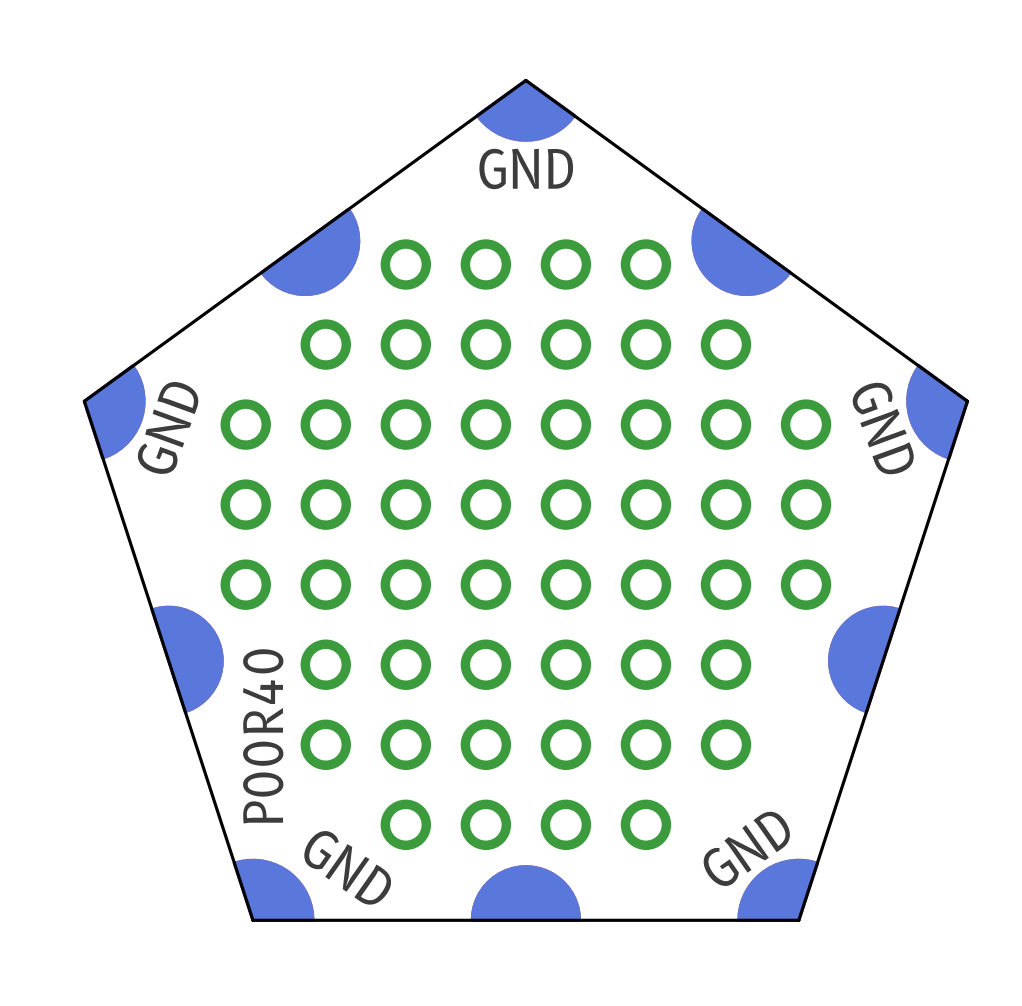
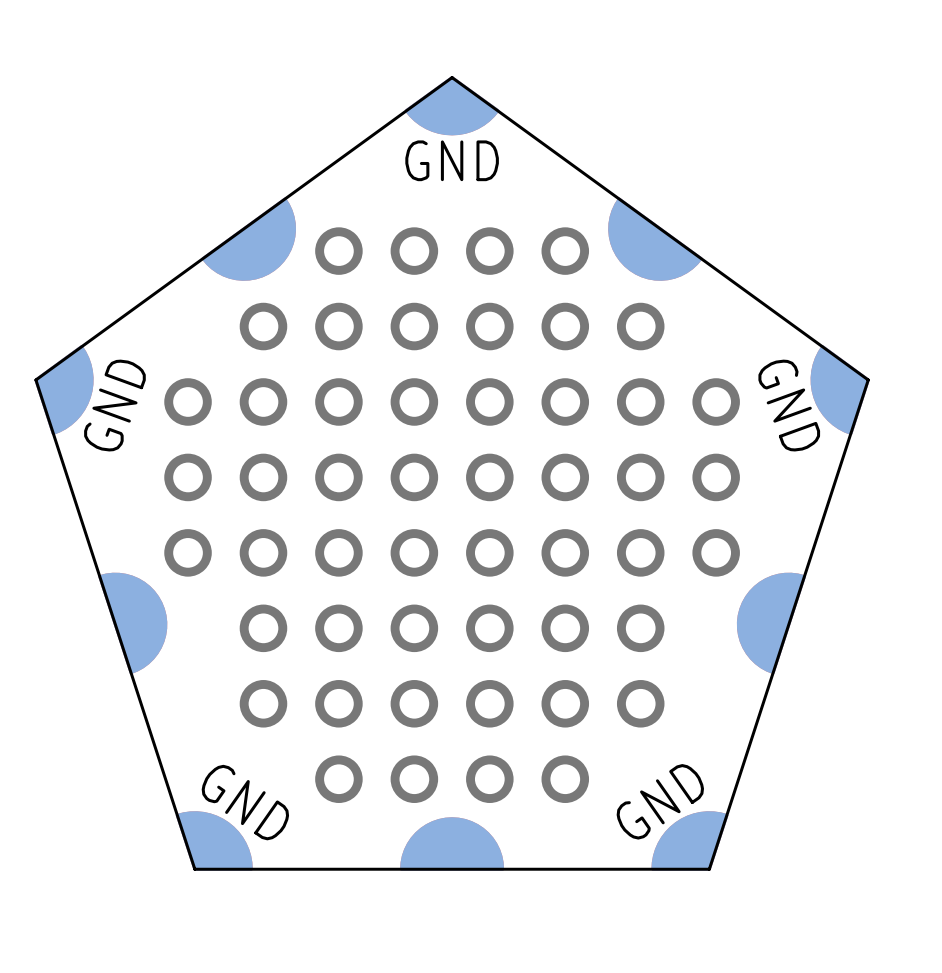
text: P00R40 (263, 736) -> none
text position: GND (347, 867) -> GND (245, 802)

